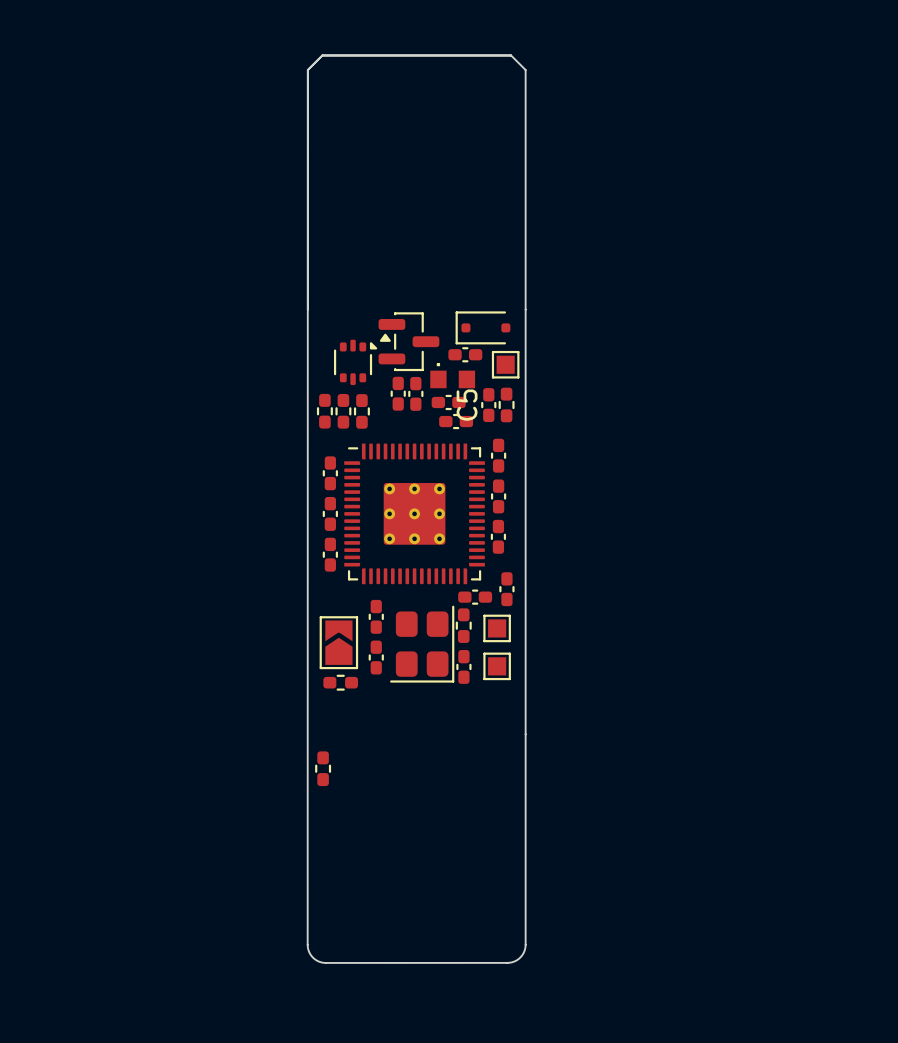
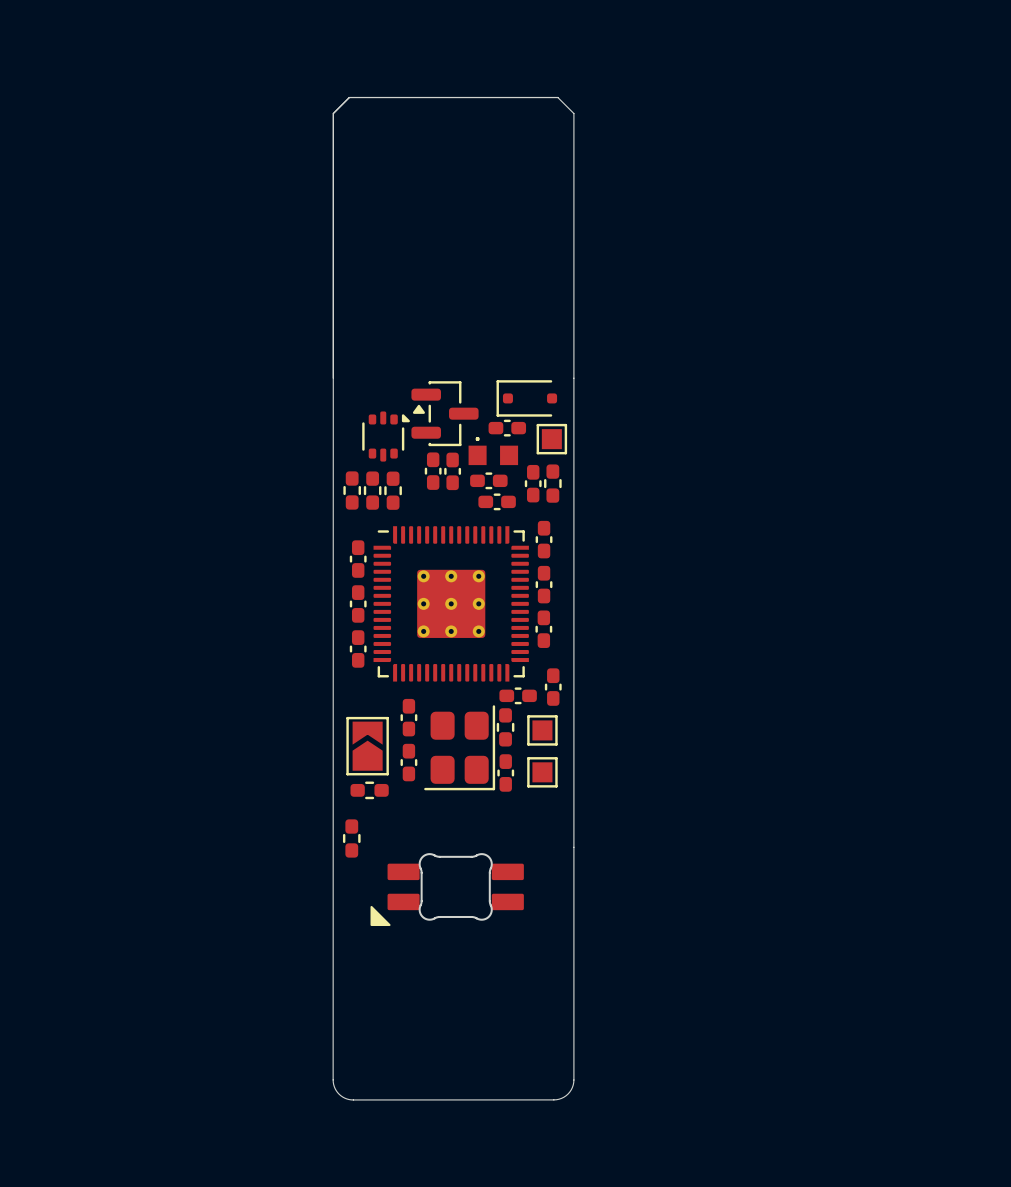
C5 name: C5 (467, 405) -> none
part position: (323, 768) -> (351, 838)
part: none -> (447, 889)

